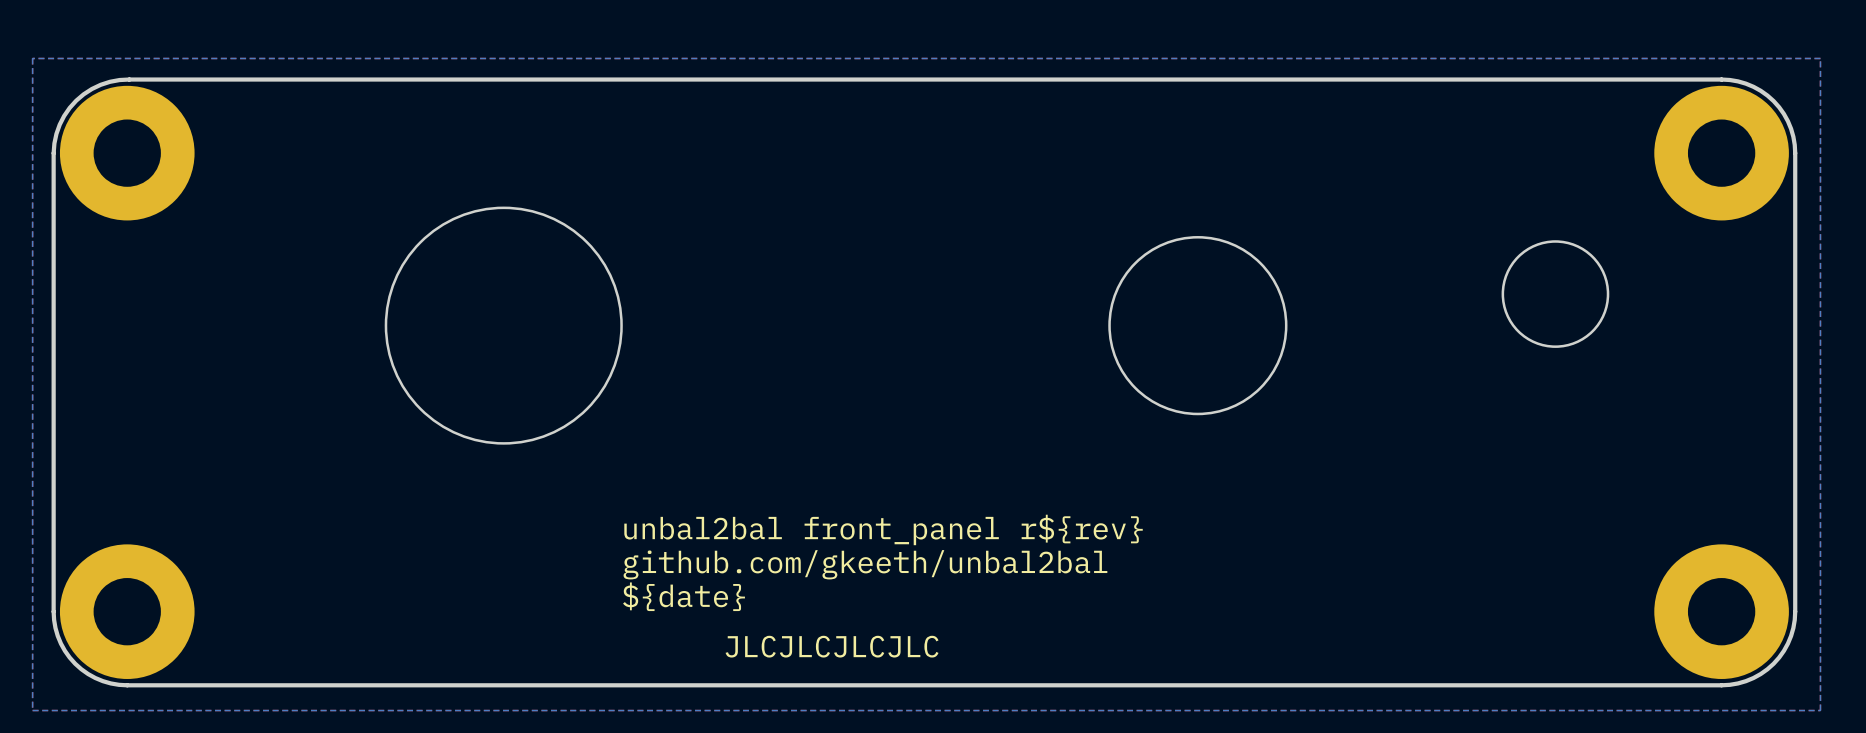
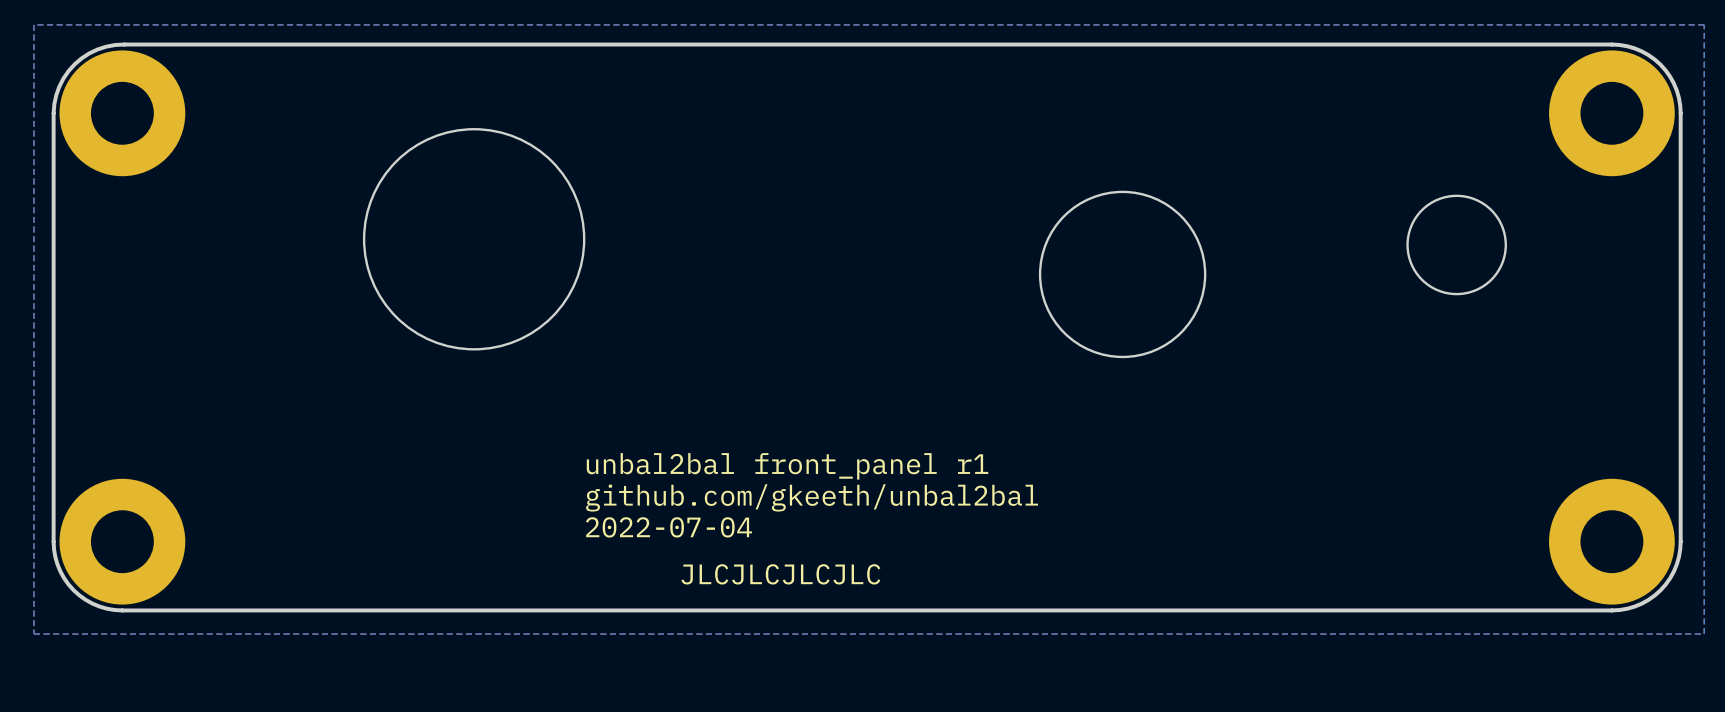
drawing position: (503, 325) -> (474, 239)
text: unbal2bal front_panel r${rev} (883, 529) -> unbal2bal front_panel r1 (787, 466)
text: ${date} (684, 596) -> 2022-07-04 (669, 527)

